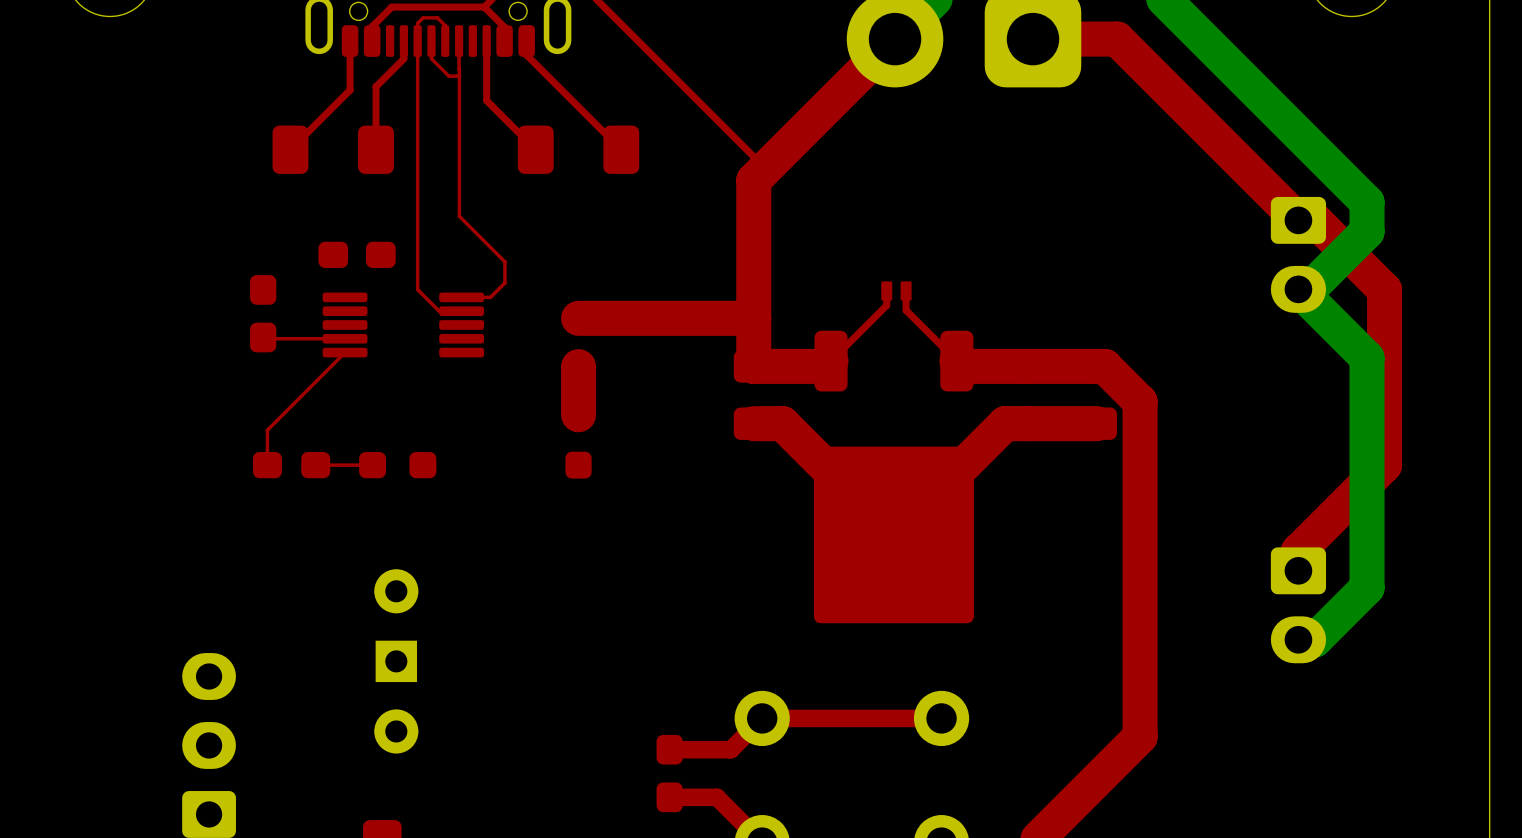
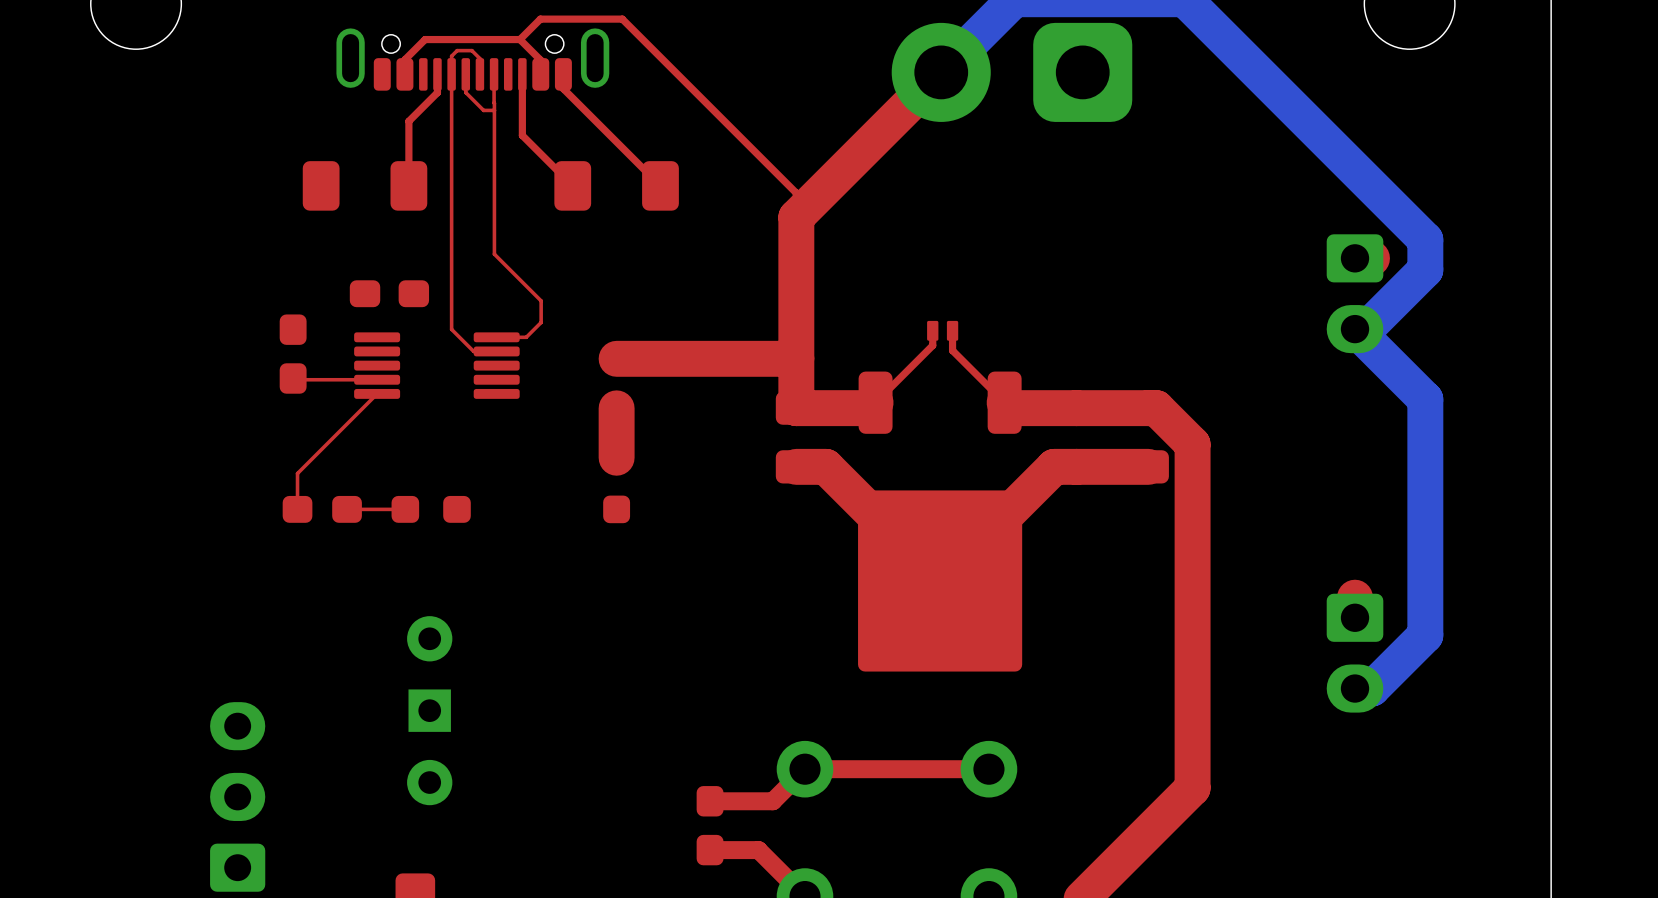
top track: (1033, 39) (1117, 39) (1298, 220) -> none
top track: (350, 41) (350, 90) (290, 149) -> none
top track: (1315, 220) (1384, 289) (1384, 465) (1298, 551) -> none

